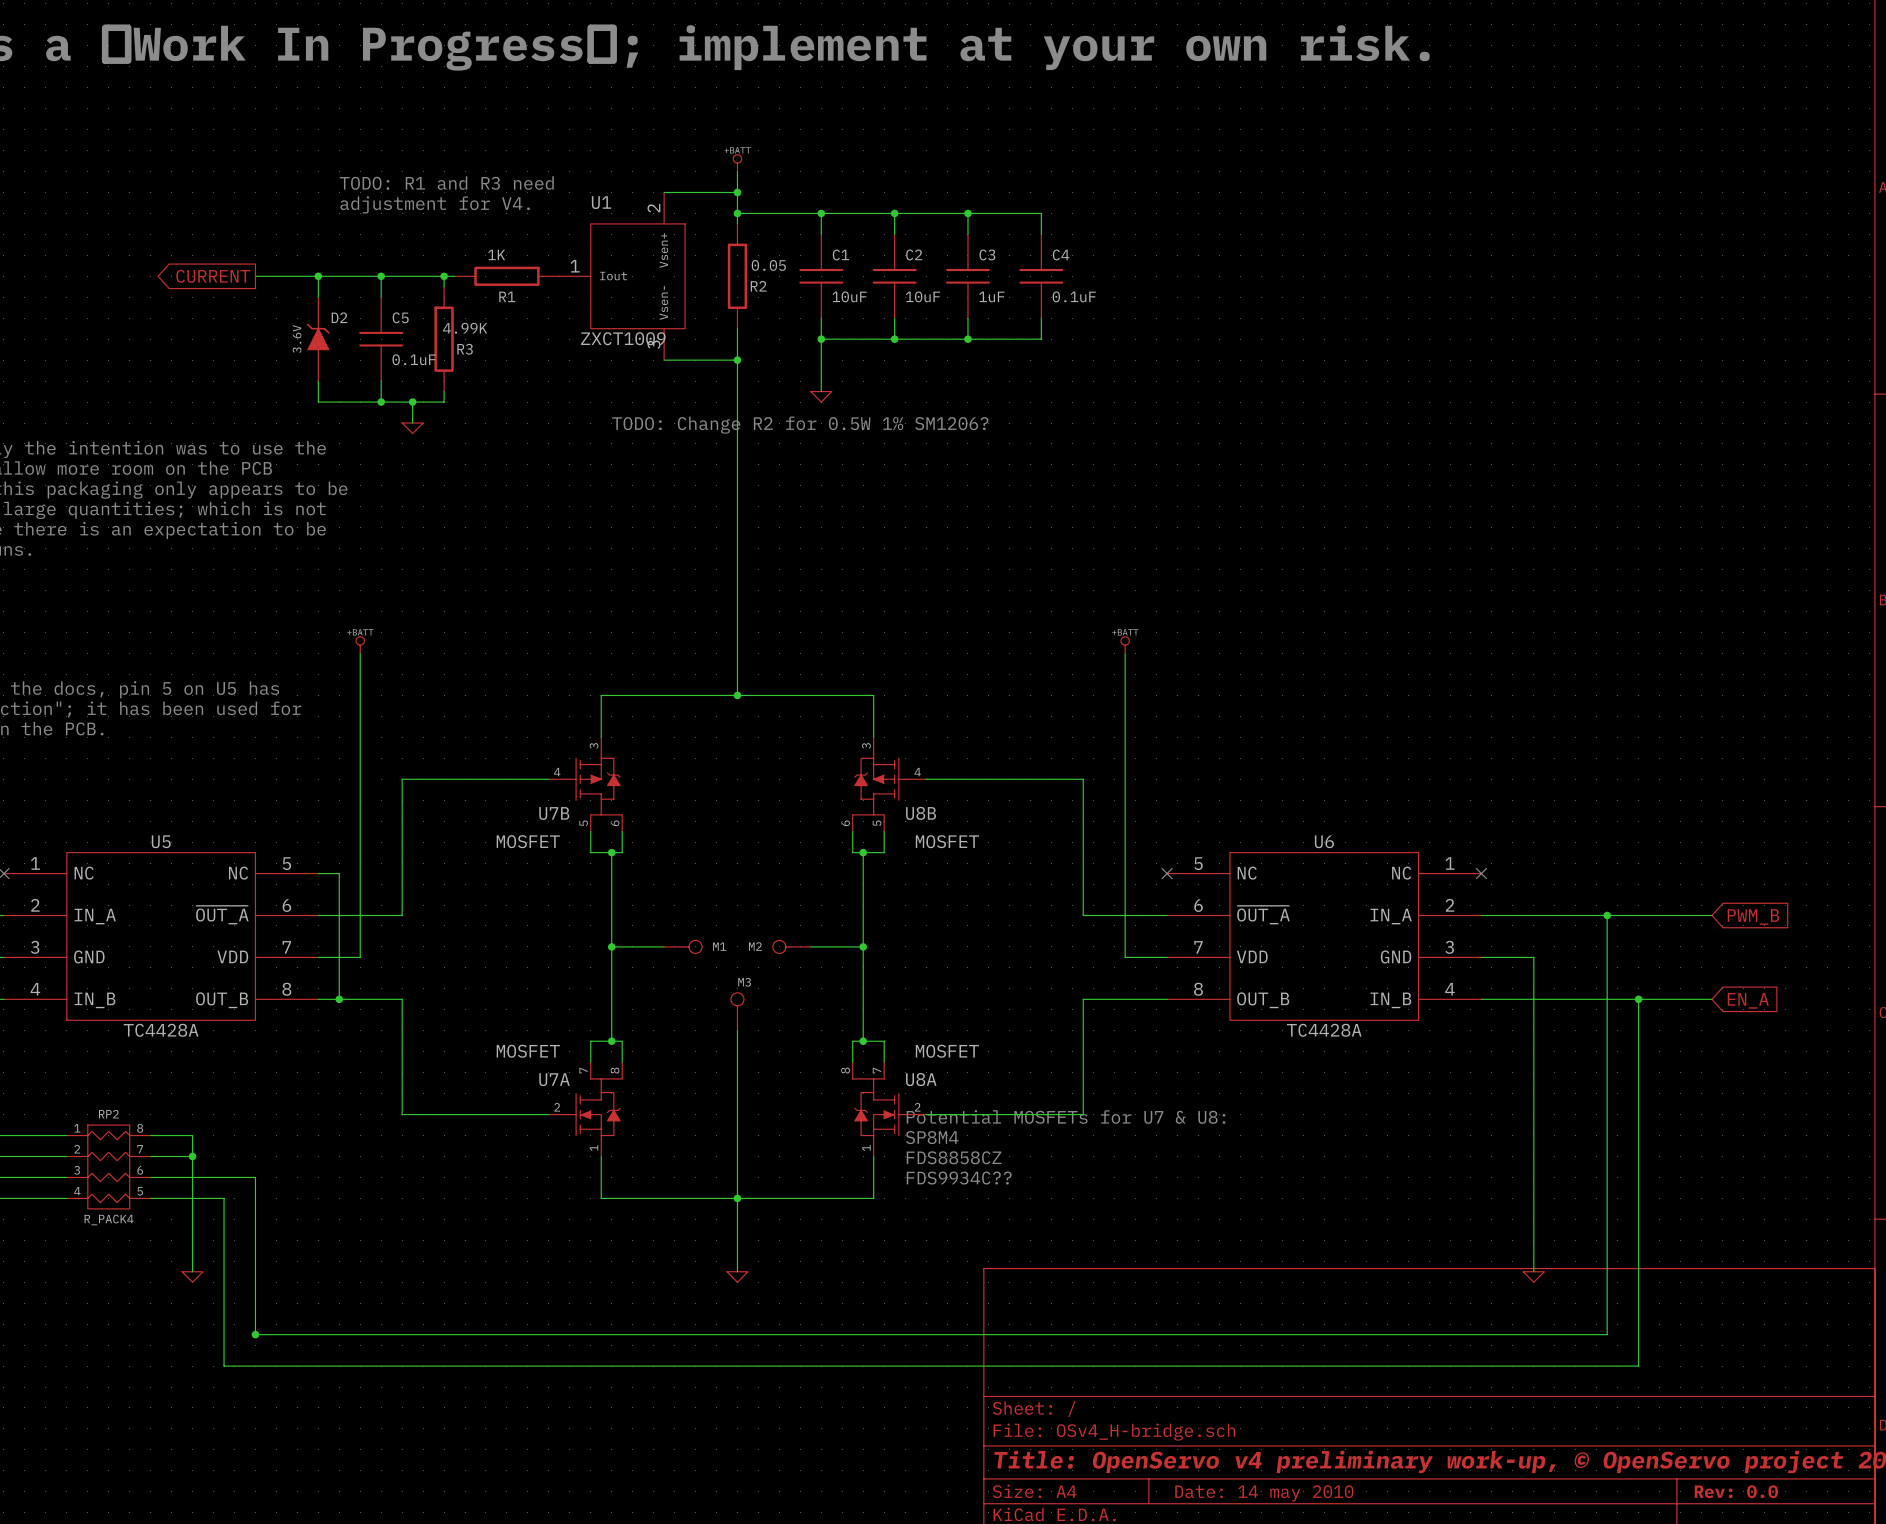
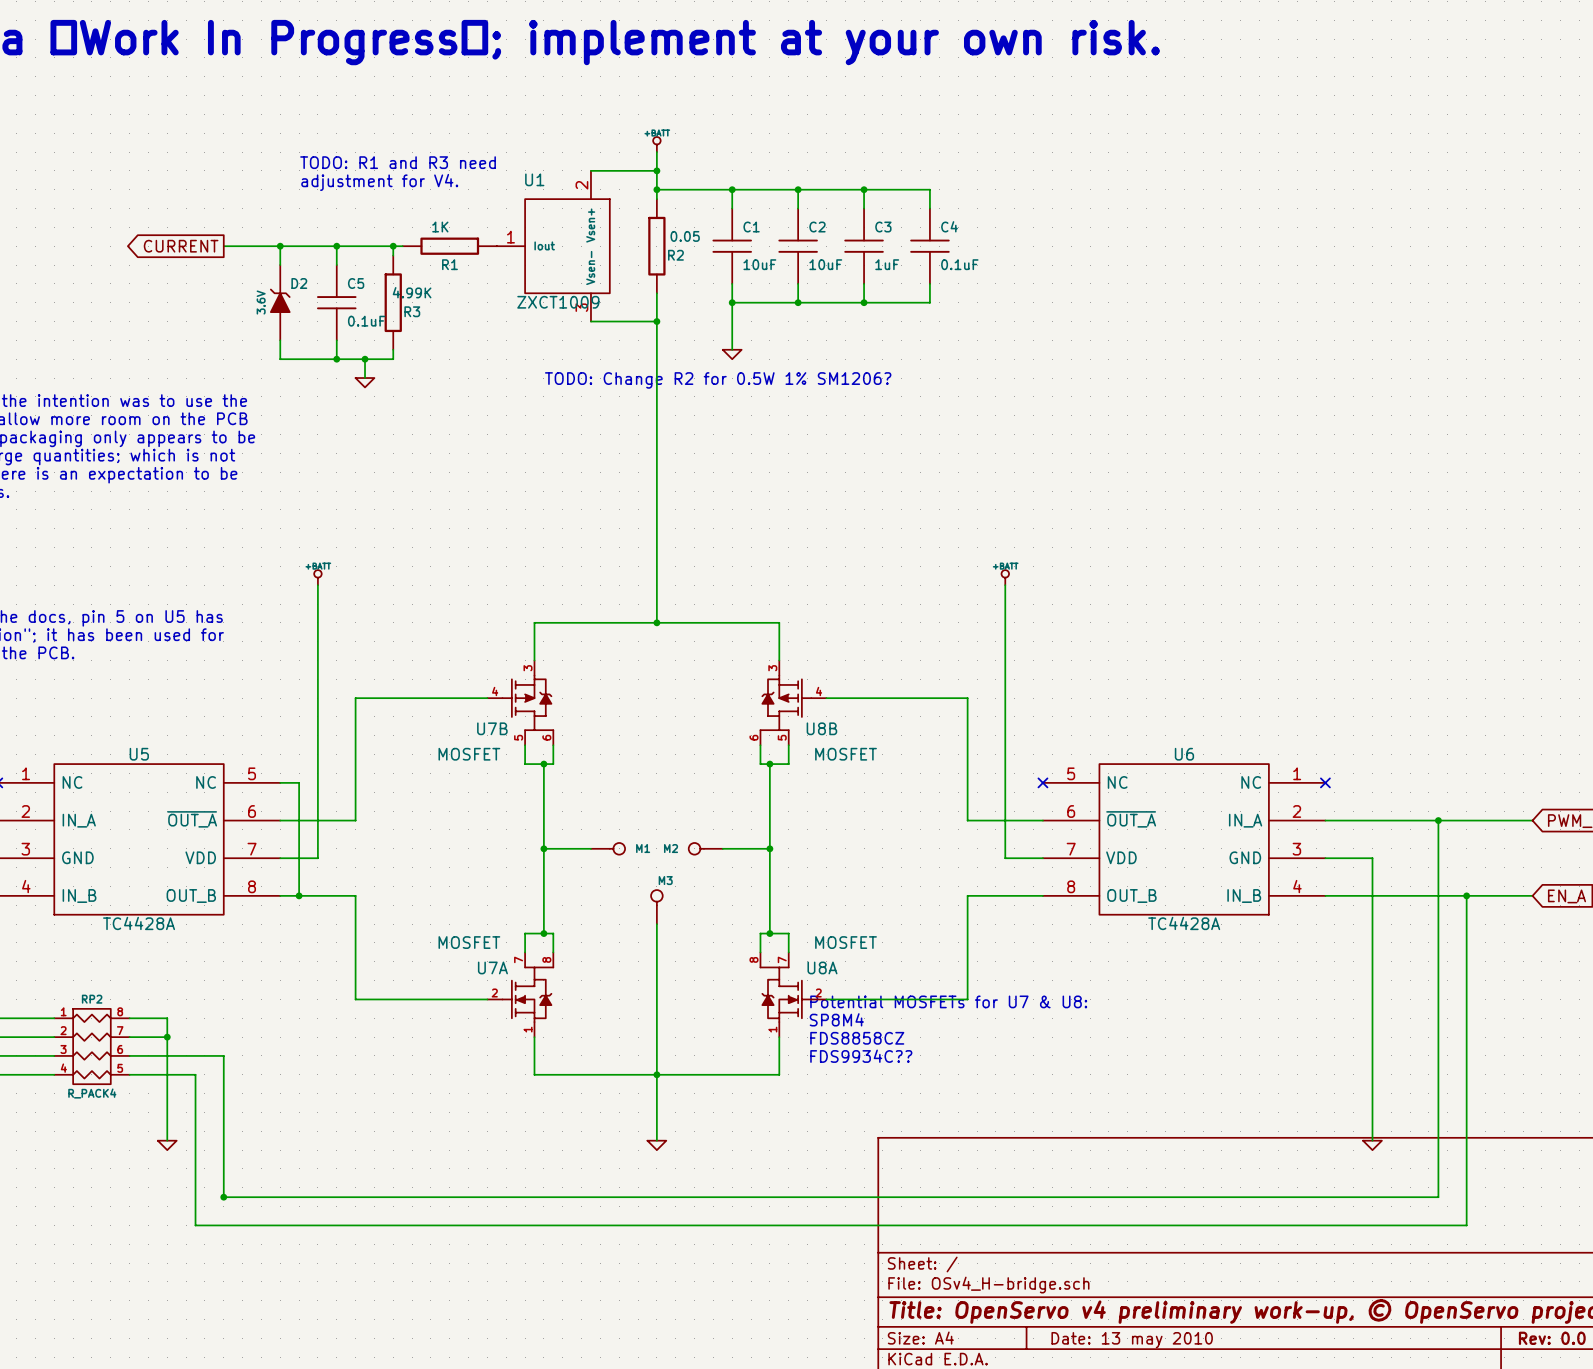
title block: Date: 14 may 2010 (1264, 1493) -> Date: 13 may 2010 (1132, 1340)

